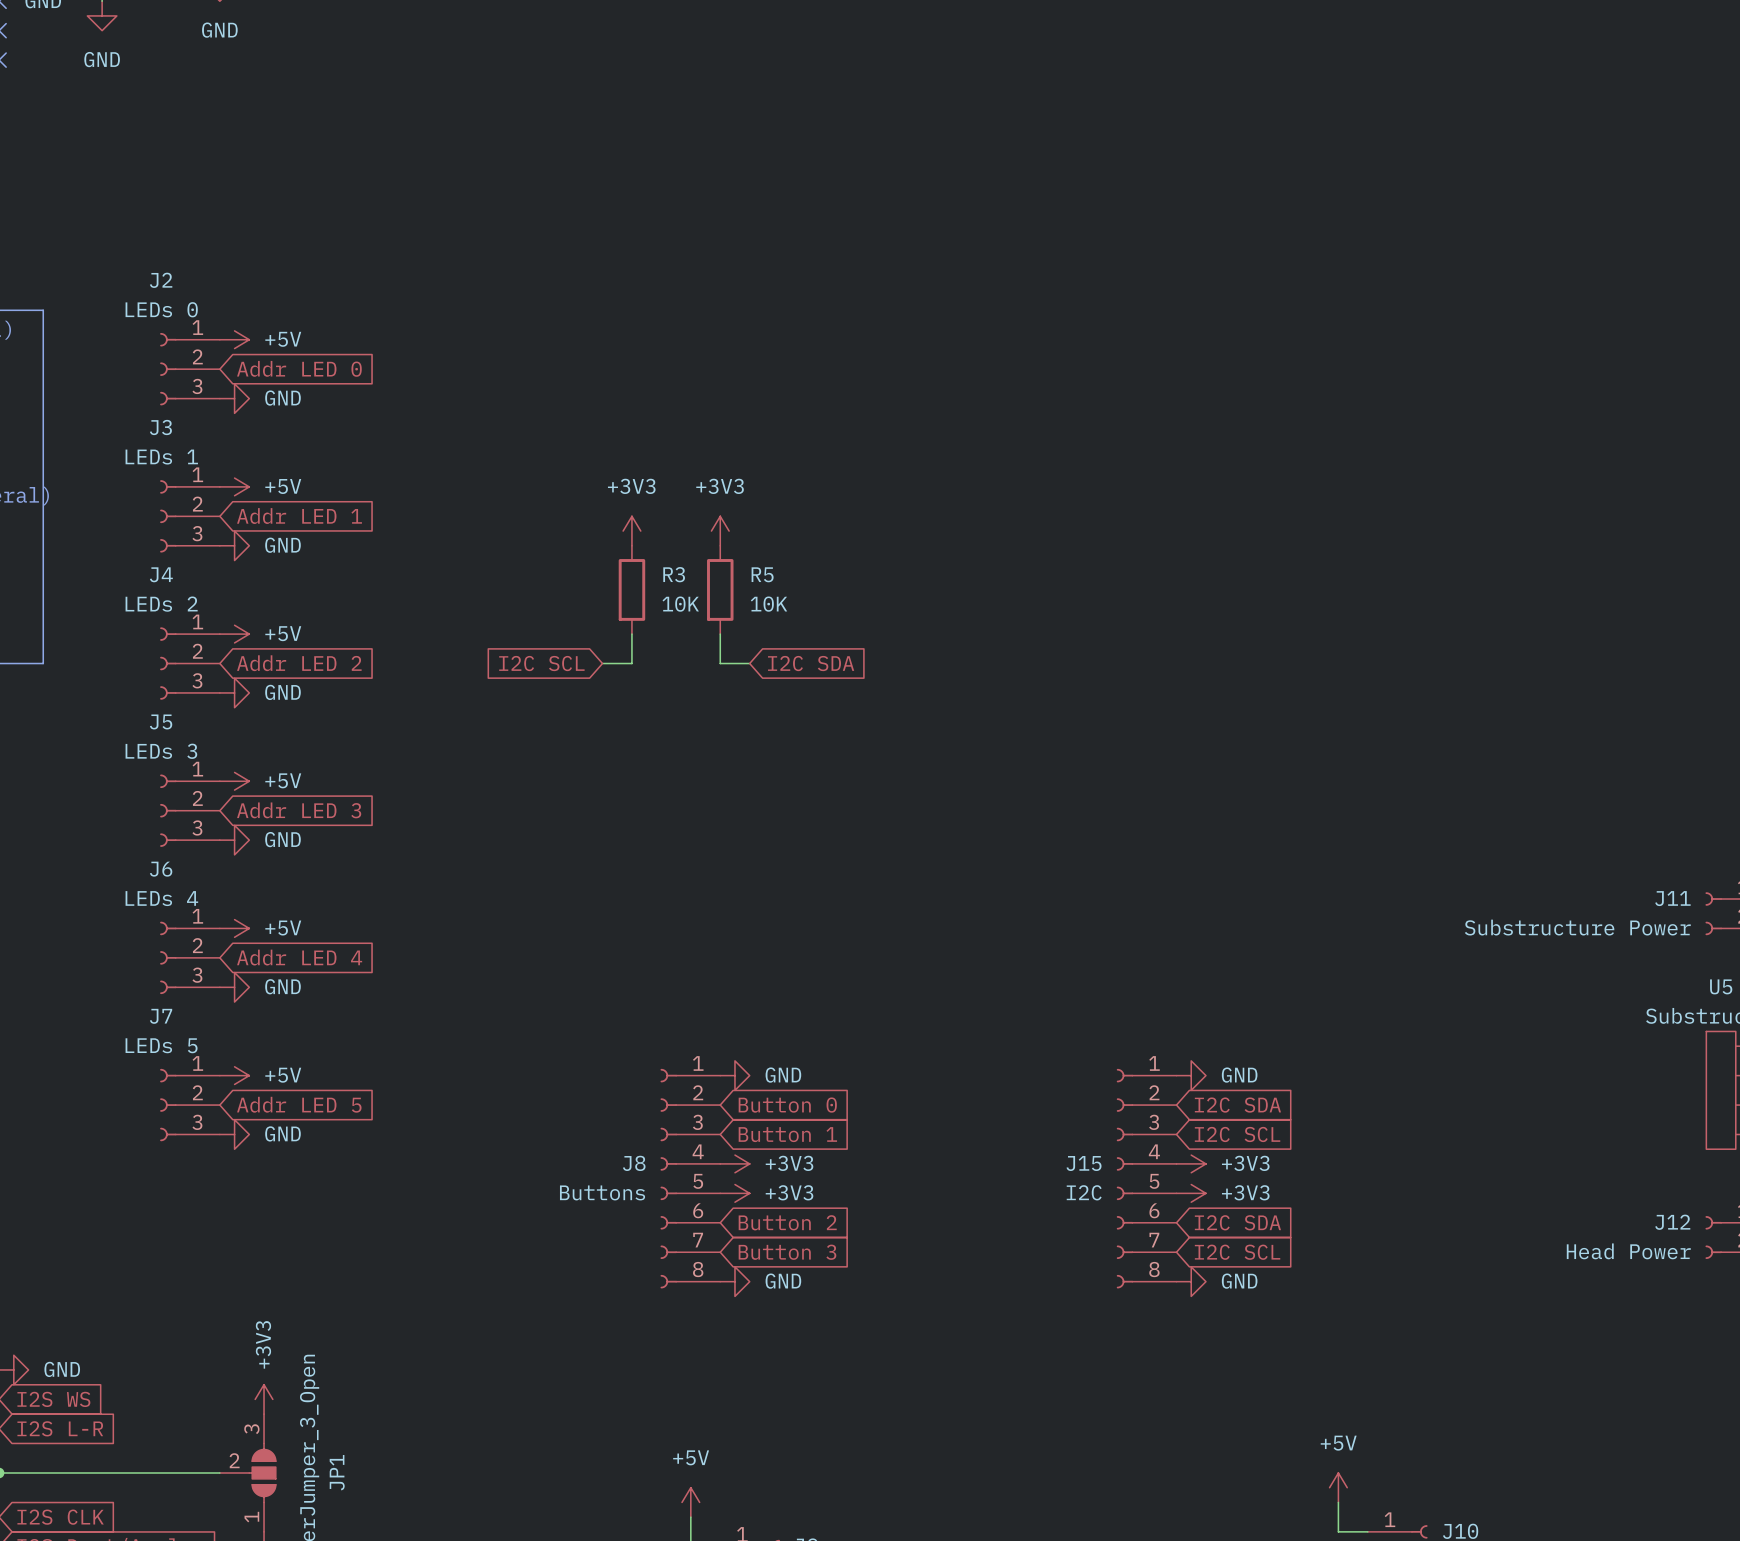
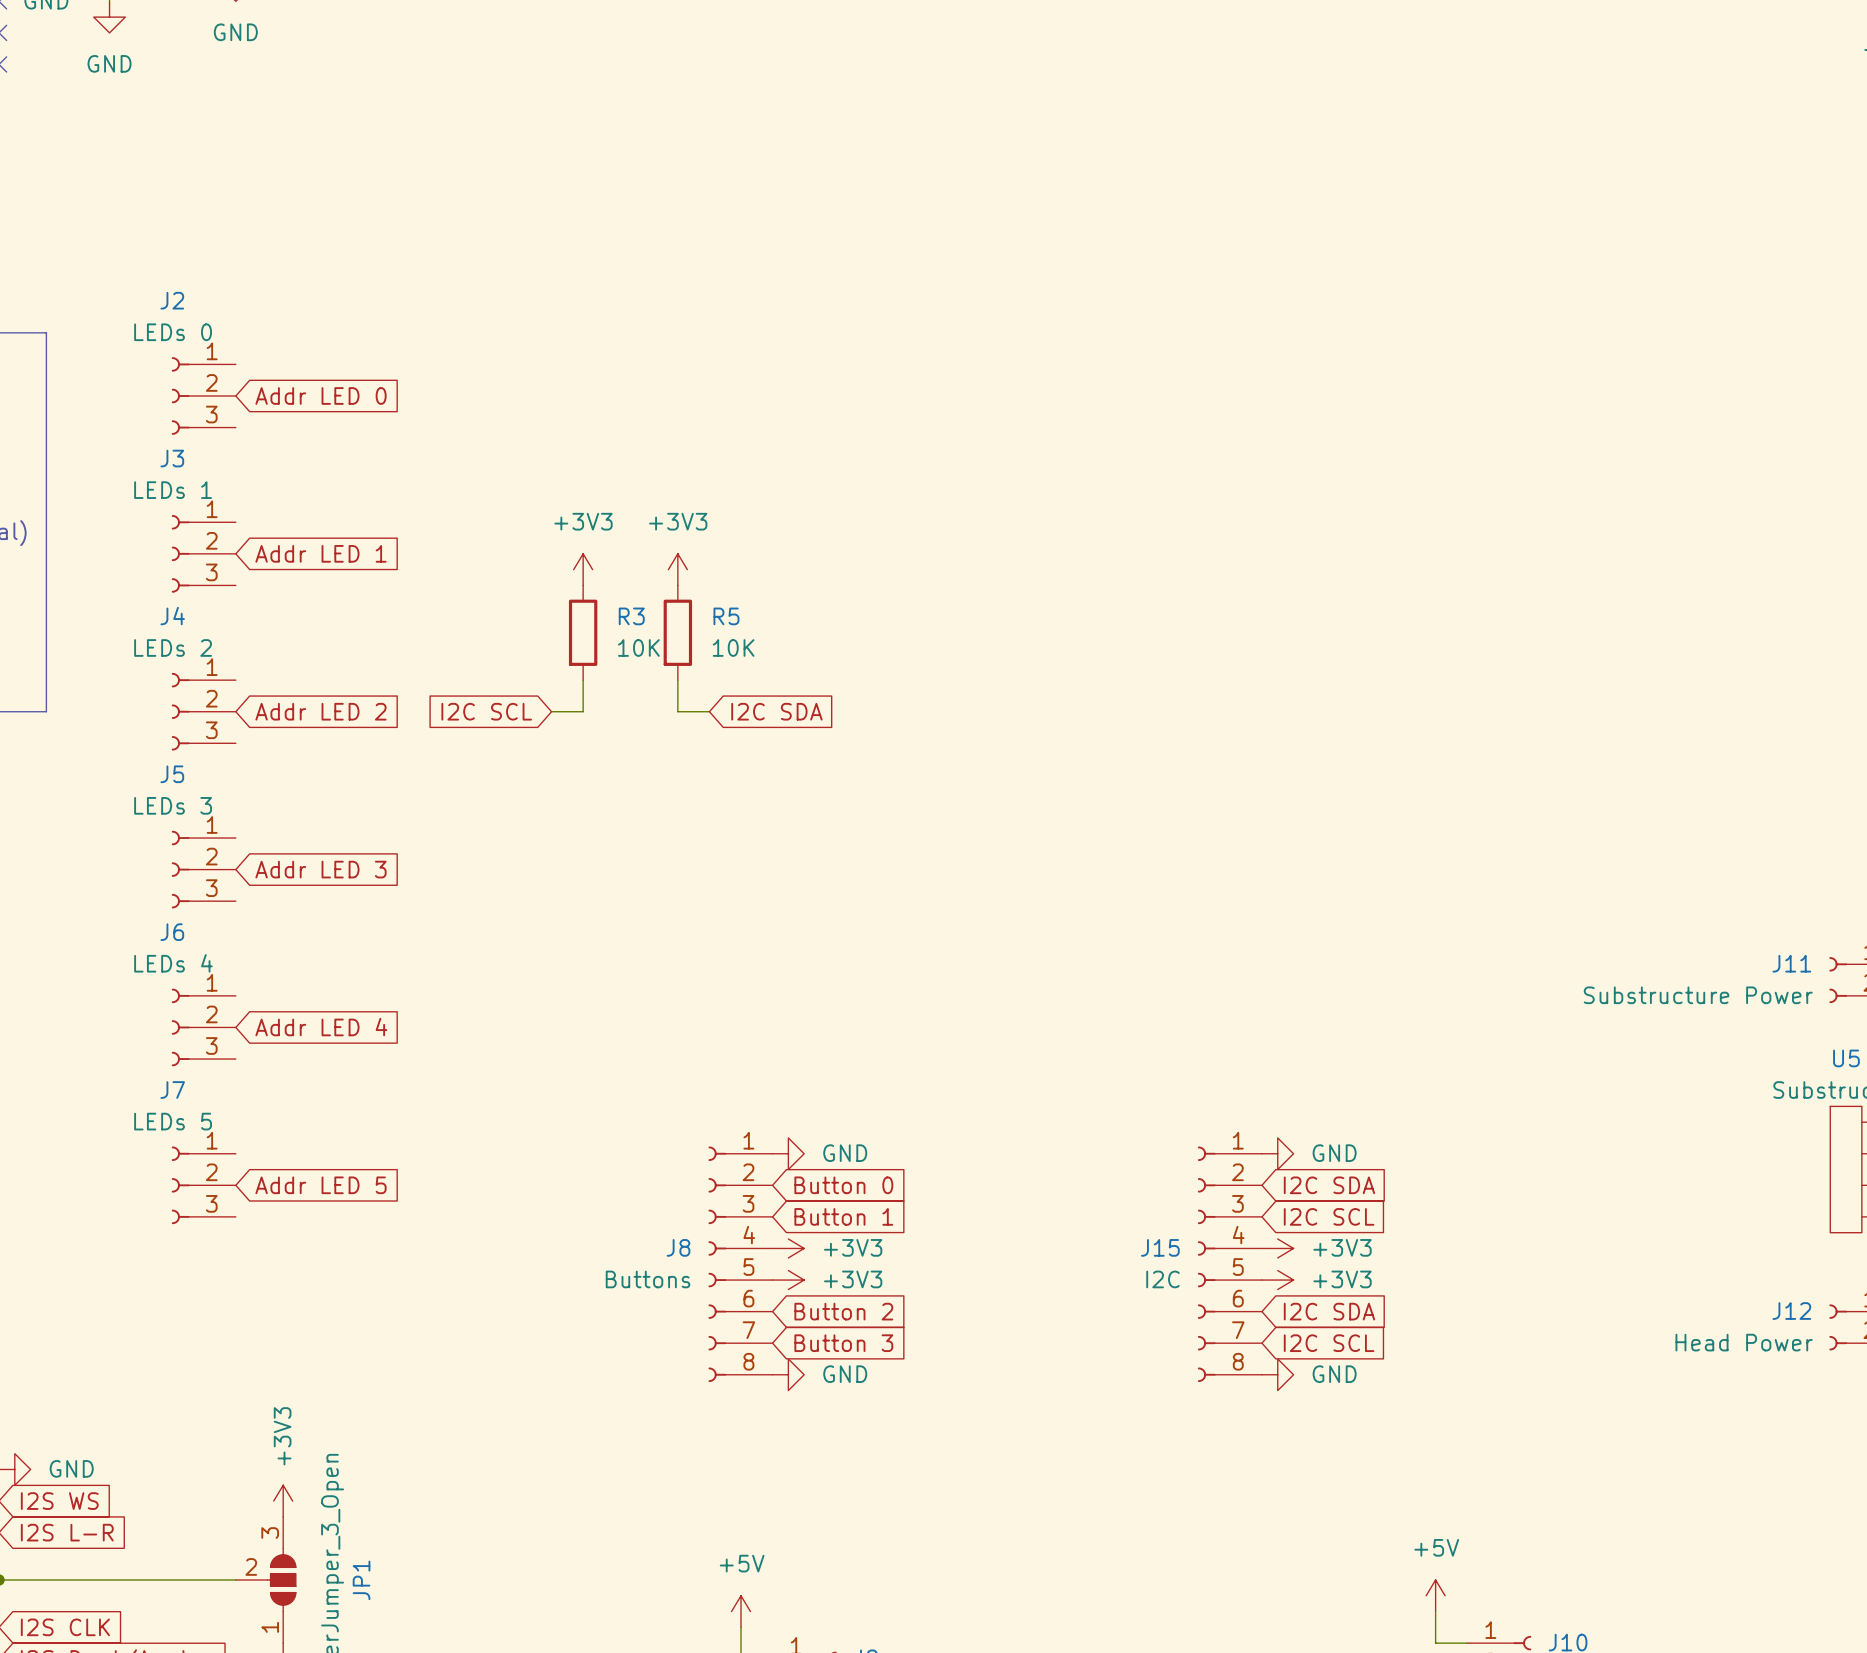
power symbol: +5V (234, 339) -> none
power symbol: GND (234, 398) -> none
power symbol: +5V (234, 486) -> none
power symbol position: +3V3 (720, 531) -> +3V3 (583, 569)
power symbol: GND (234, 545) -> none
R3 name: R3 (674, 574) -> R5 (726, 616)
R3: none -> 10K (583, 632)
R5: 10K (720, 589) -> none
power symbol: +5V (234, 634) -> none
wire: none -> (583, 680) (583, 711) (551, 711)
wire: (720, 634) (720, 663) (749, 663) -> none
global label position: I2C SCL (541, 663) -> I2C SCL (486, 711)
wire: (602, 663) (631, 663) -> (709, 711) (677, 711)
global label position: I2C SDA (811, 663) -> I2C SDA (776, 711)
power symbol: GND (234, 692) -> none
power symbol: +5V (234, 781) -> none
power symbol: GND (234, 840) -> none
power symbol: +5V (234, 928) -> none
power symbol: GND (234, 987) -> none
power symbol: +5V (234, 1075) -> none
power symbol: GND (234, 1134) -> none

